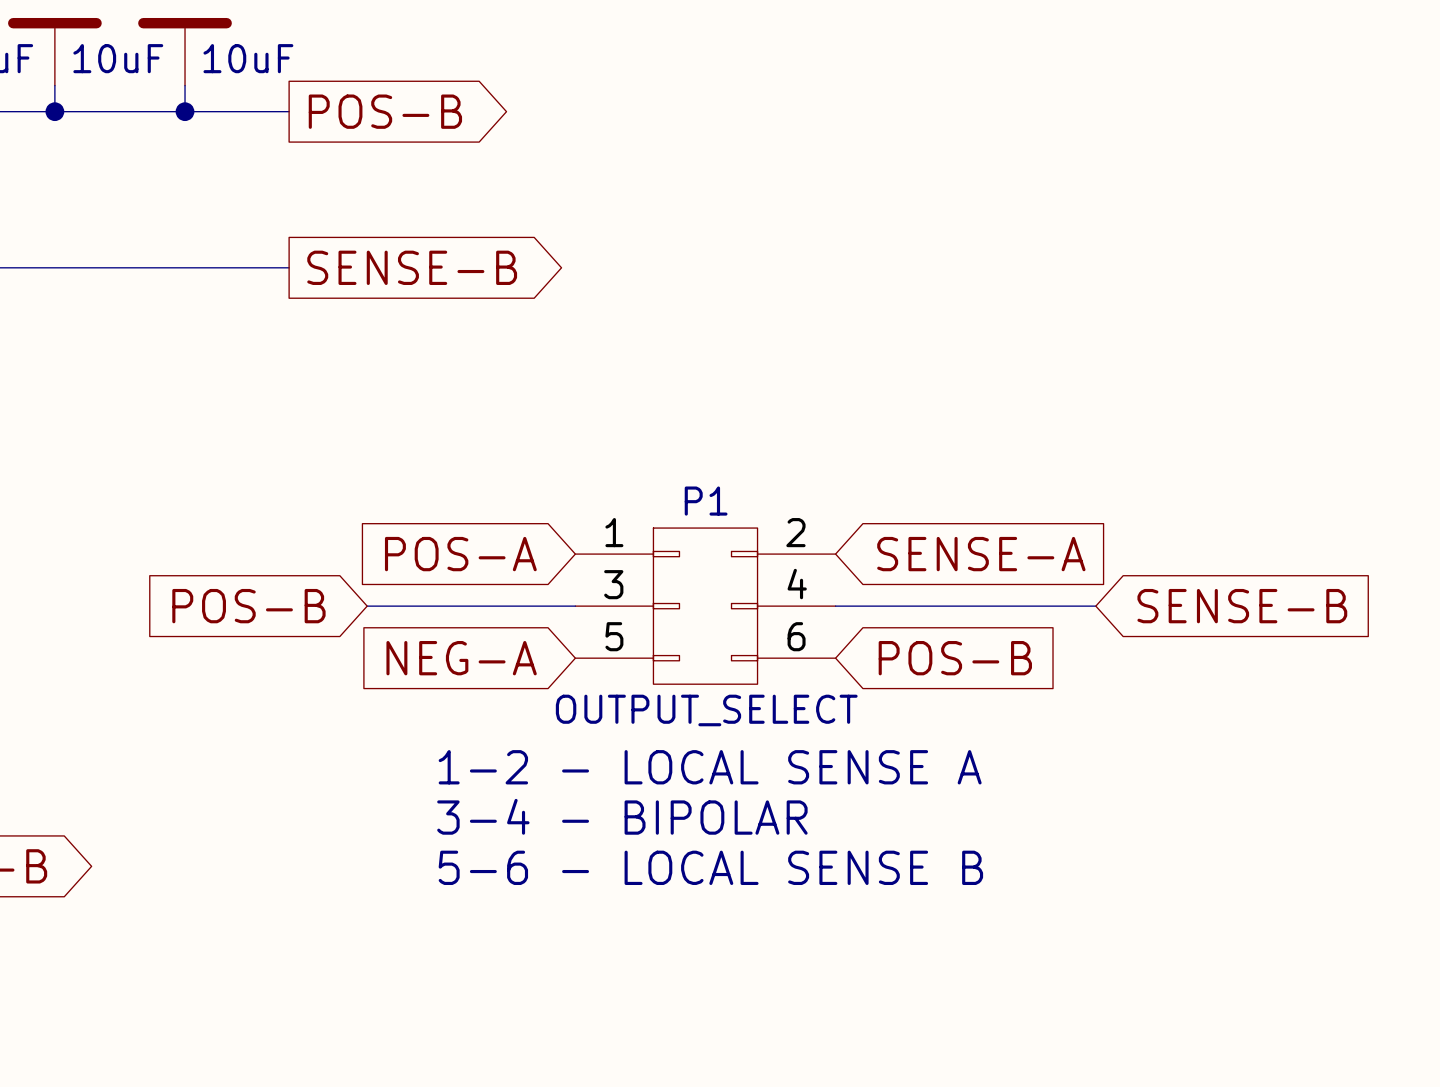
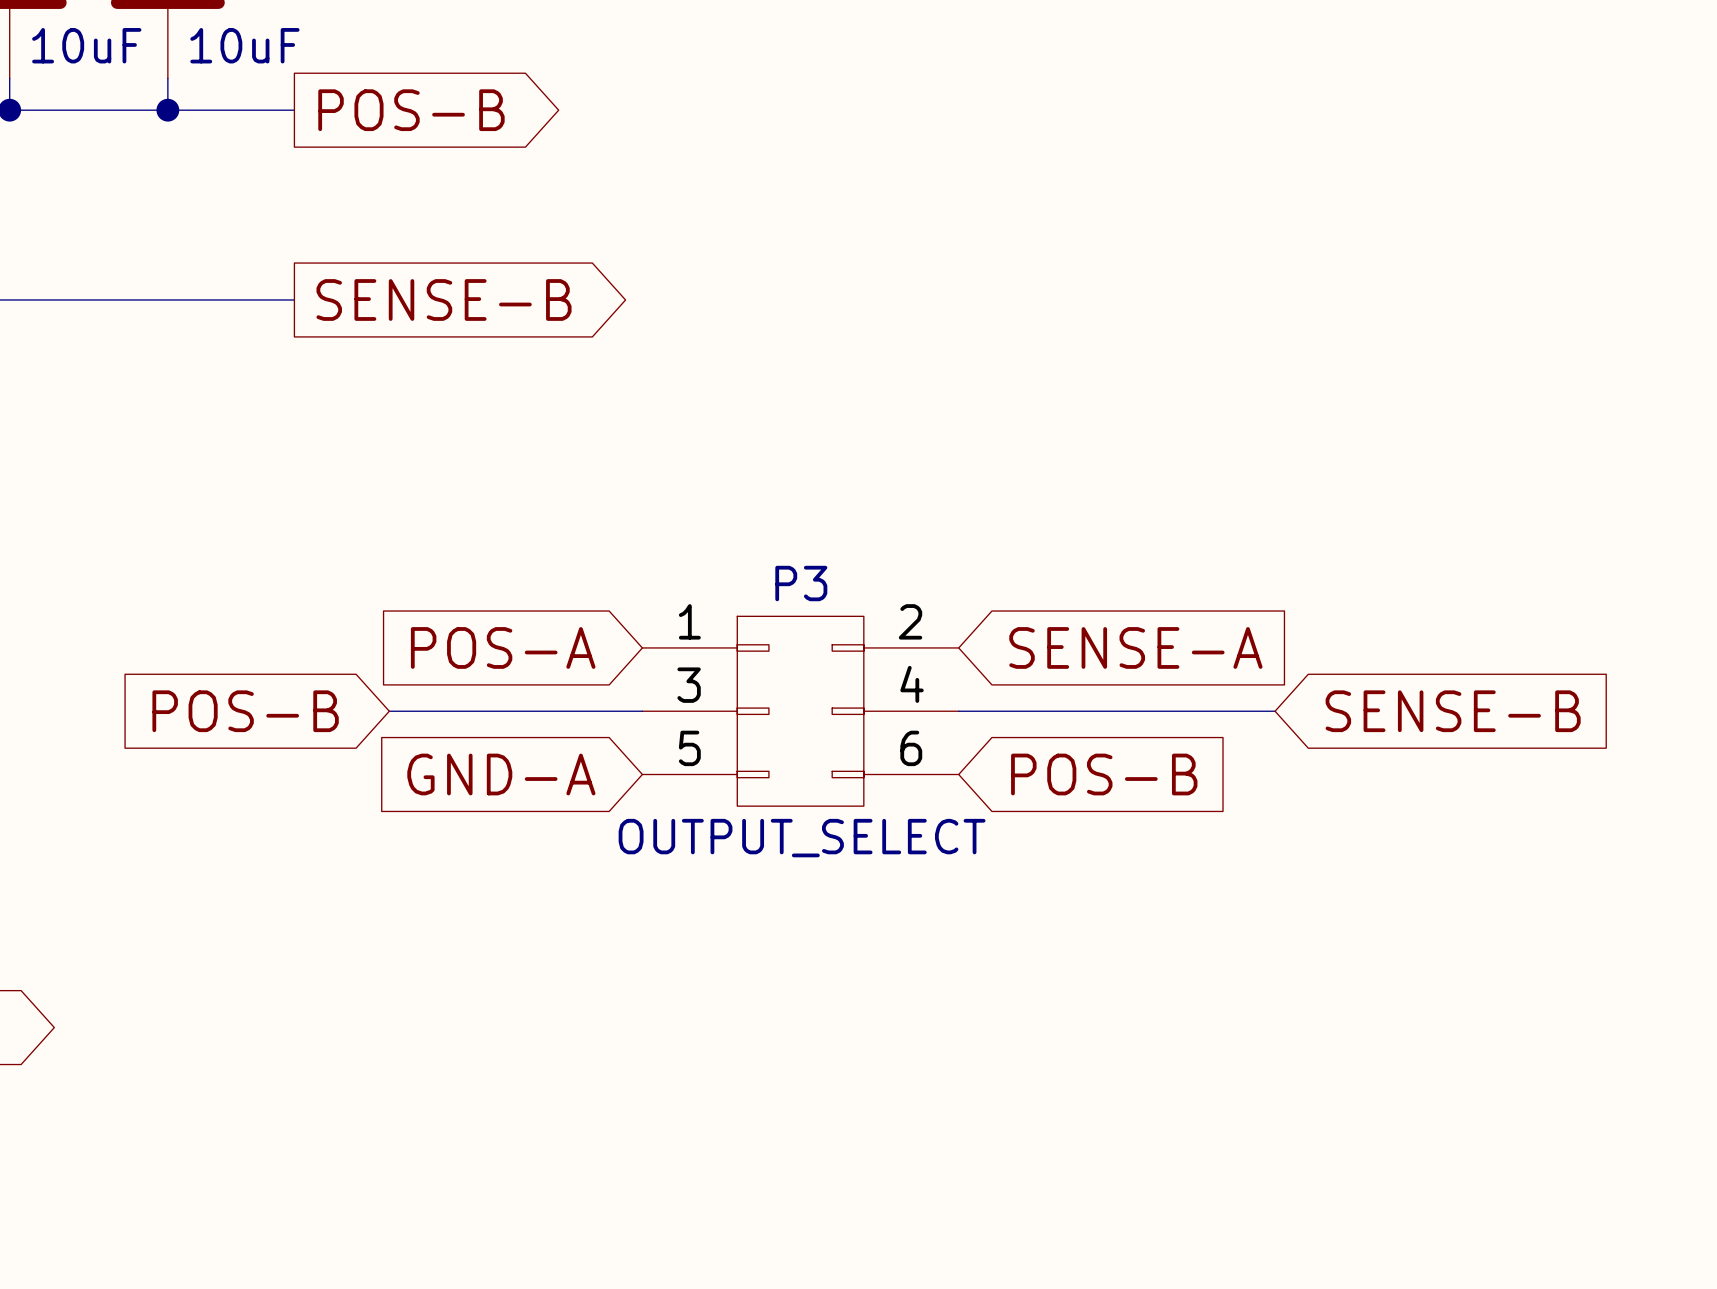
P1 name: P1 (706, 501) -> P3 (801, 583)
global label: NEG-A (461, 658) -> GND-A (501, 774)
text: 1-2 - LOCAL SENSE A (710, 767) -> none
text: 3-4 - BIPOLAR (622, 816) -> none
text: 5-6 - LOCAL SENSE B (710, 867) -> none

